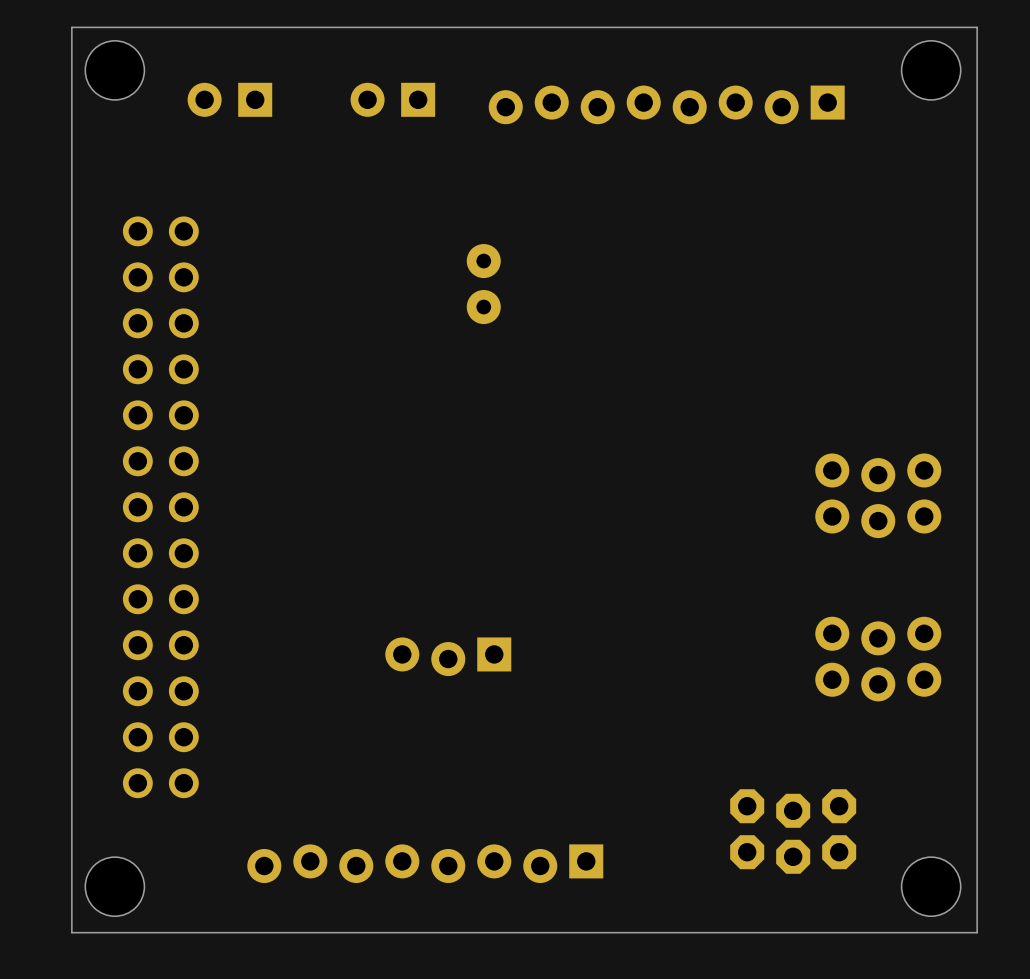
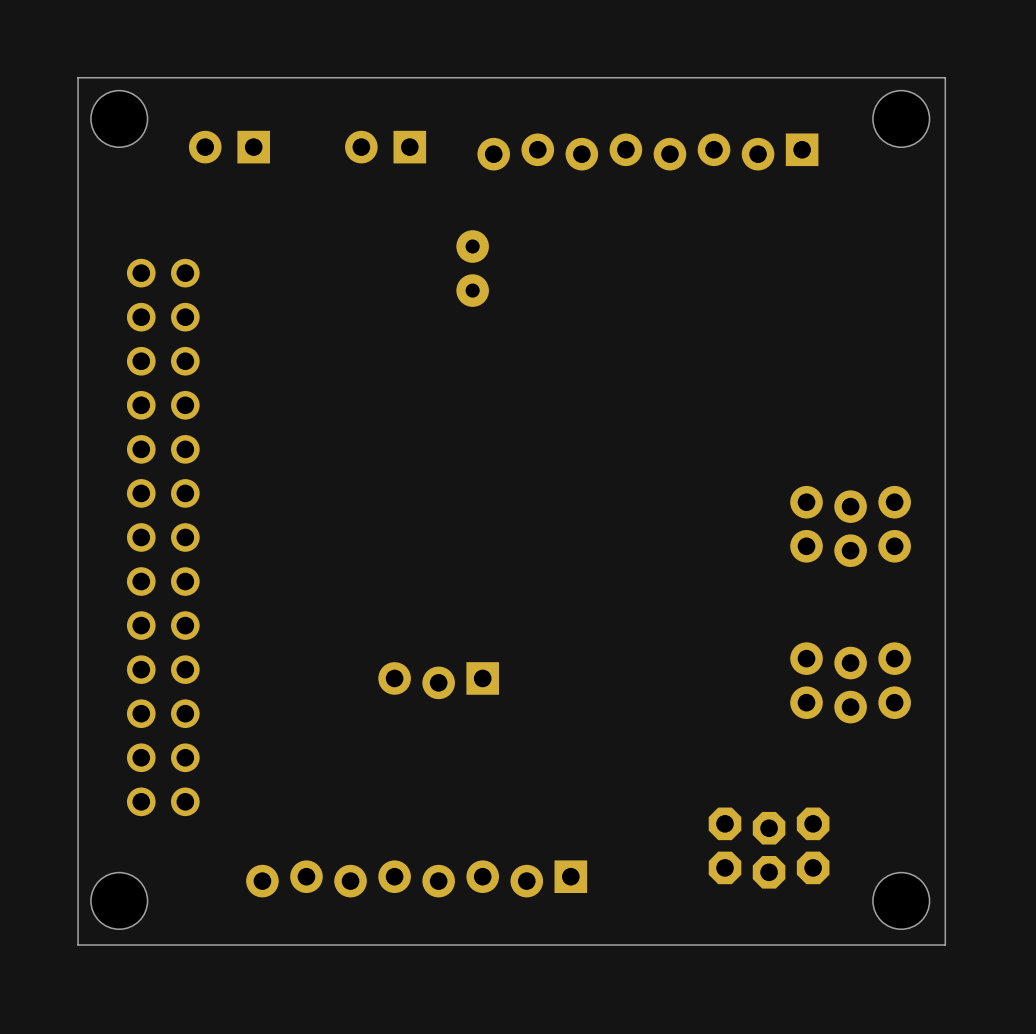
part position: (483, 284) -> (472, 268)

